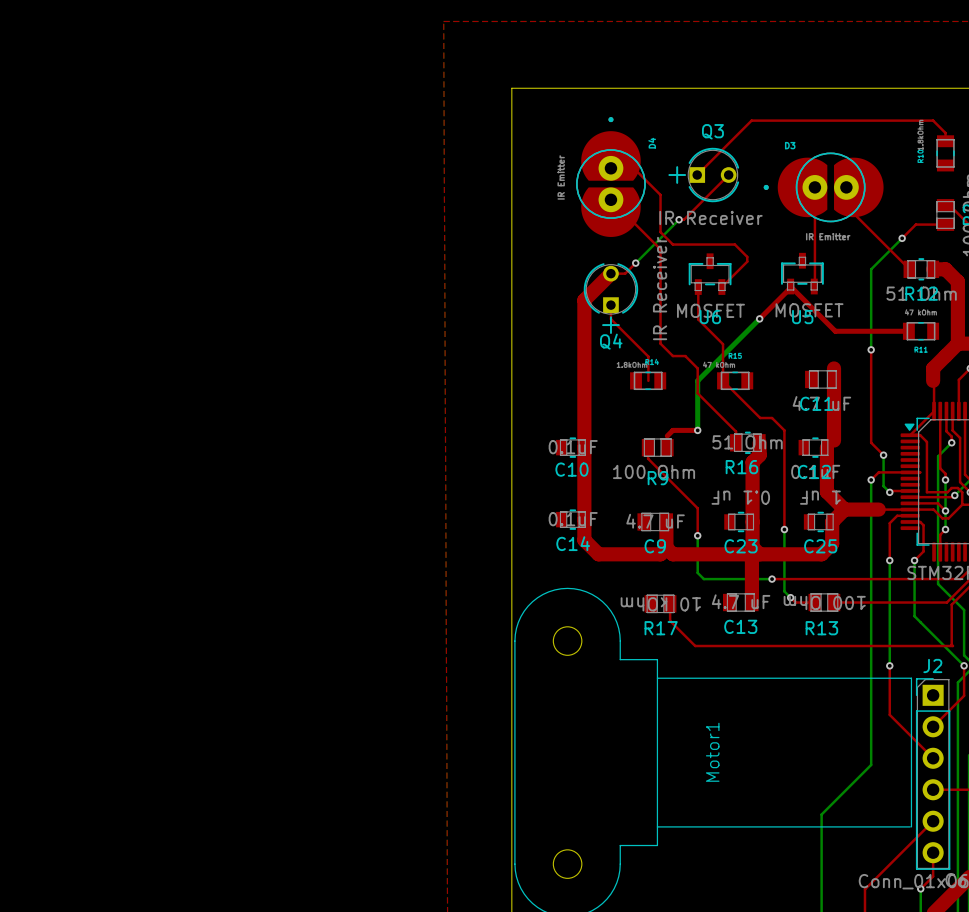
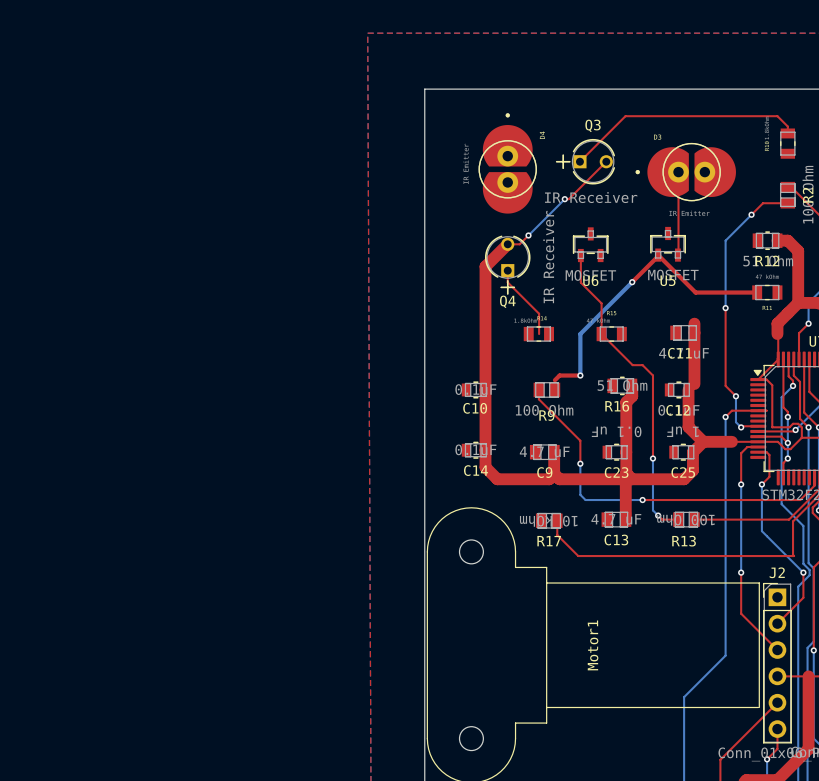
top track: (610, 168) (633, 168) (660, 194) (660, 232) (672, 244) (734, 244) (747, 256) (747, 261) (721, 287) -> none
top track: (846, 187) (846, 206) (909, 269) -> none
top track: (610, 199) (660, 249) (660, 343) (672, 356) (685, 356) (697, 368) (697, 393) (736, 431) (736, 442) -> none

